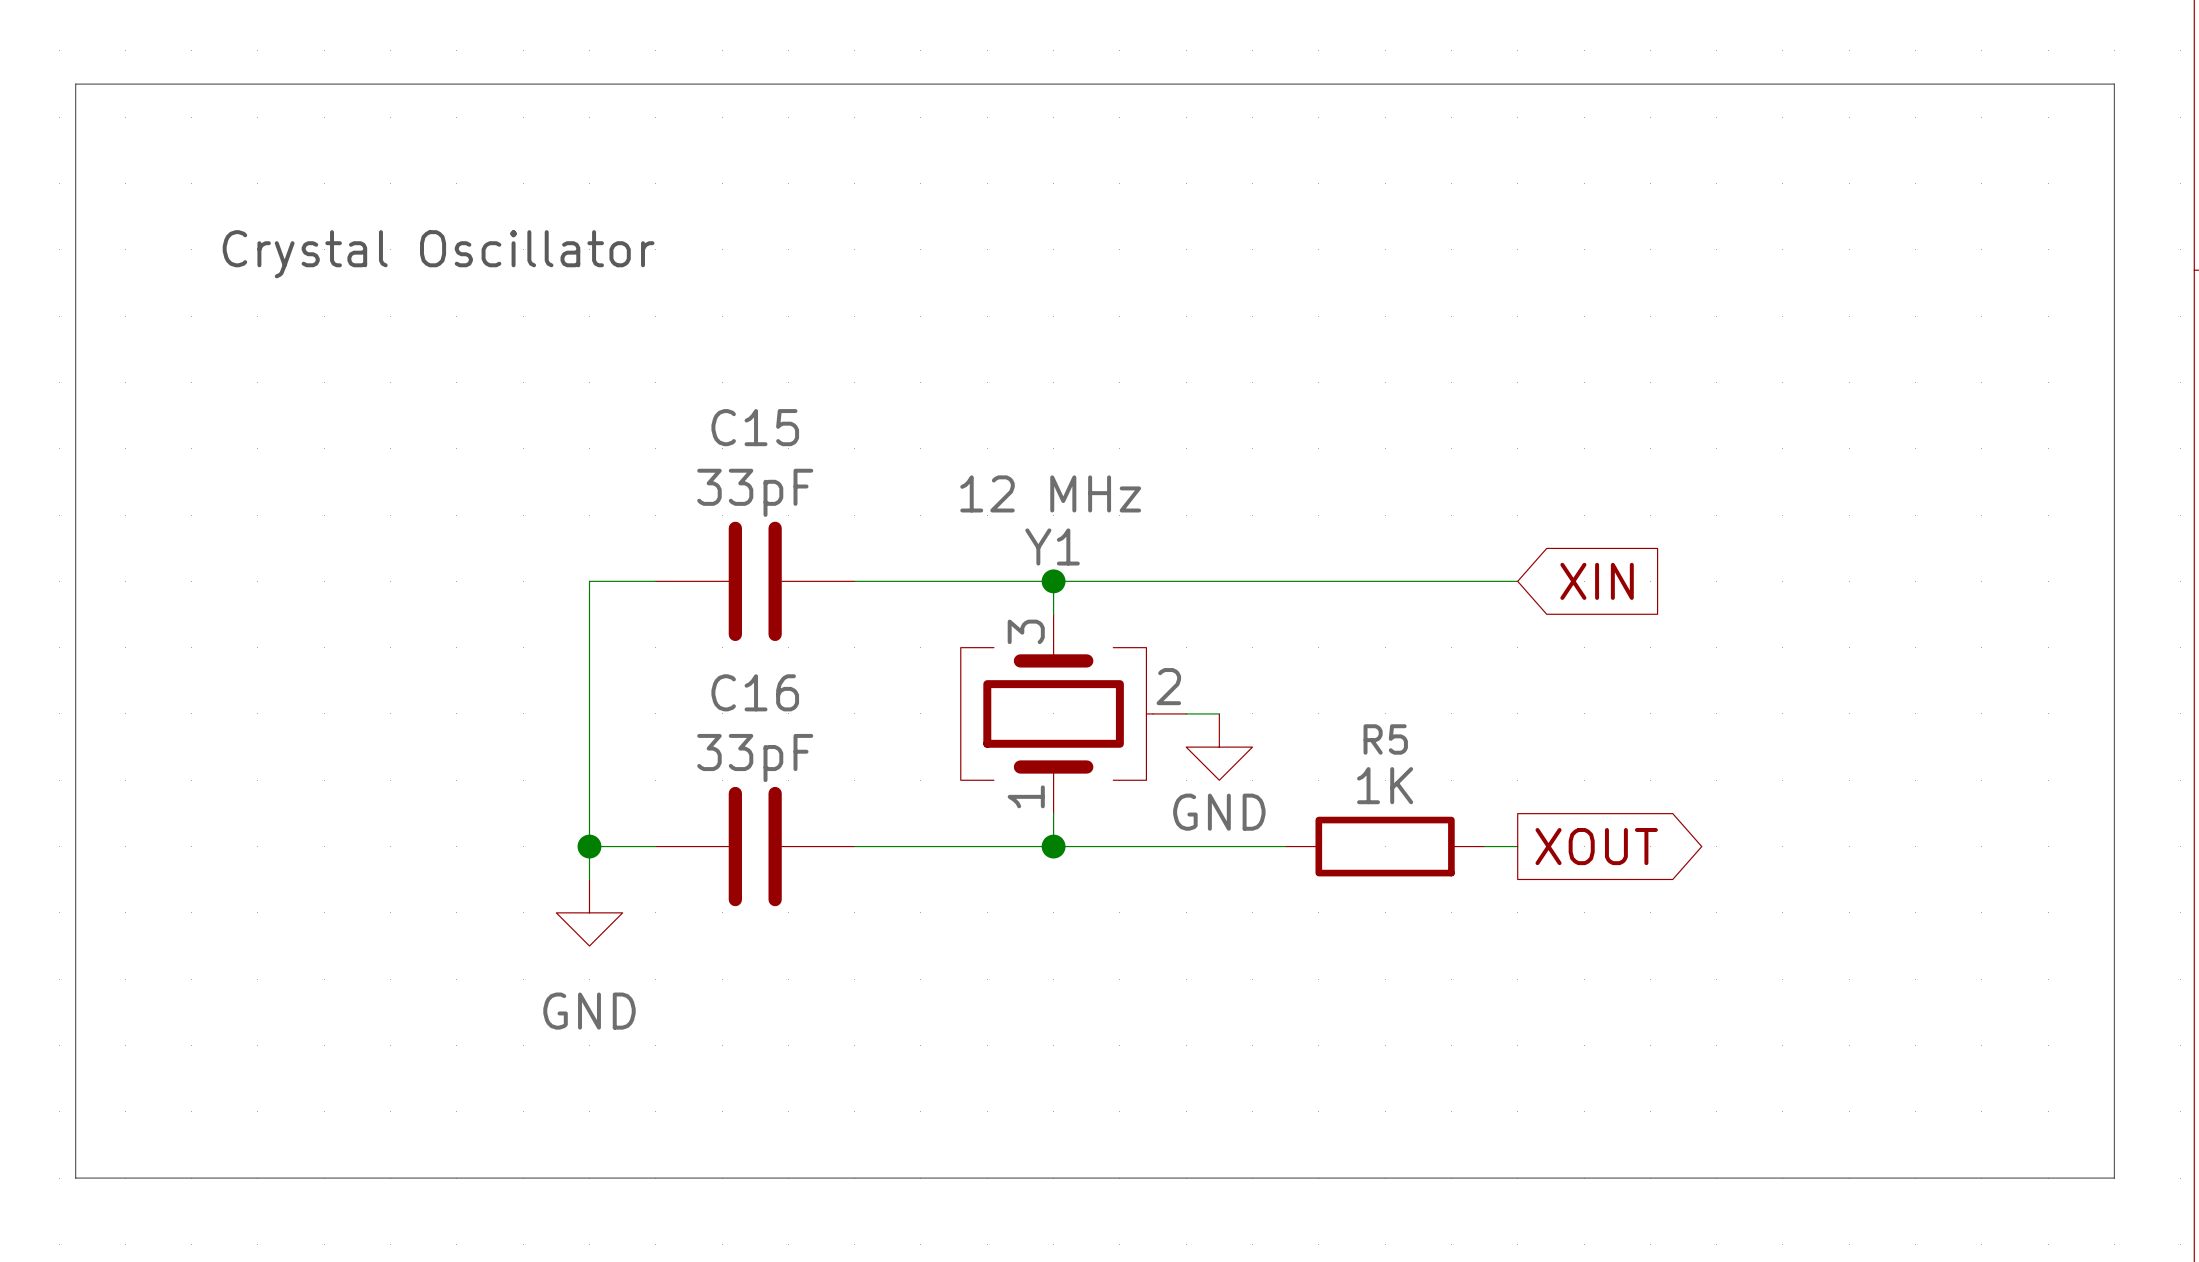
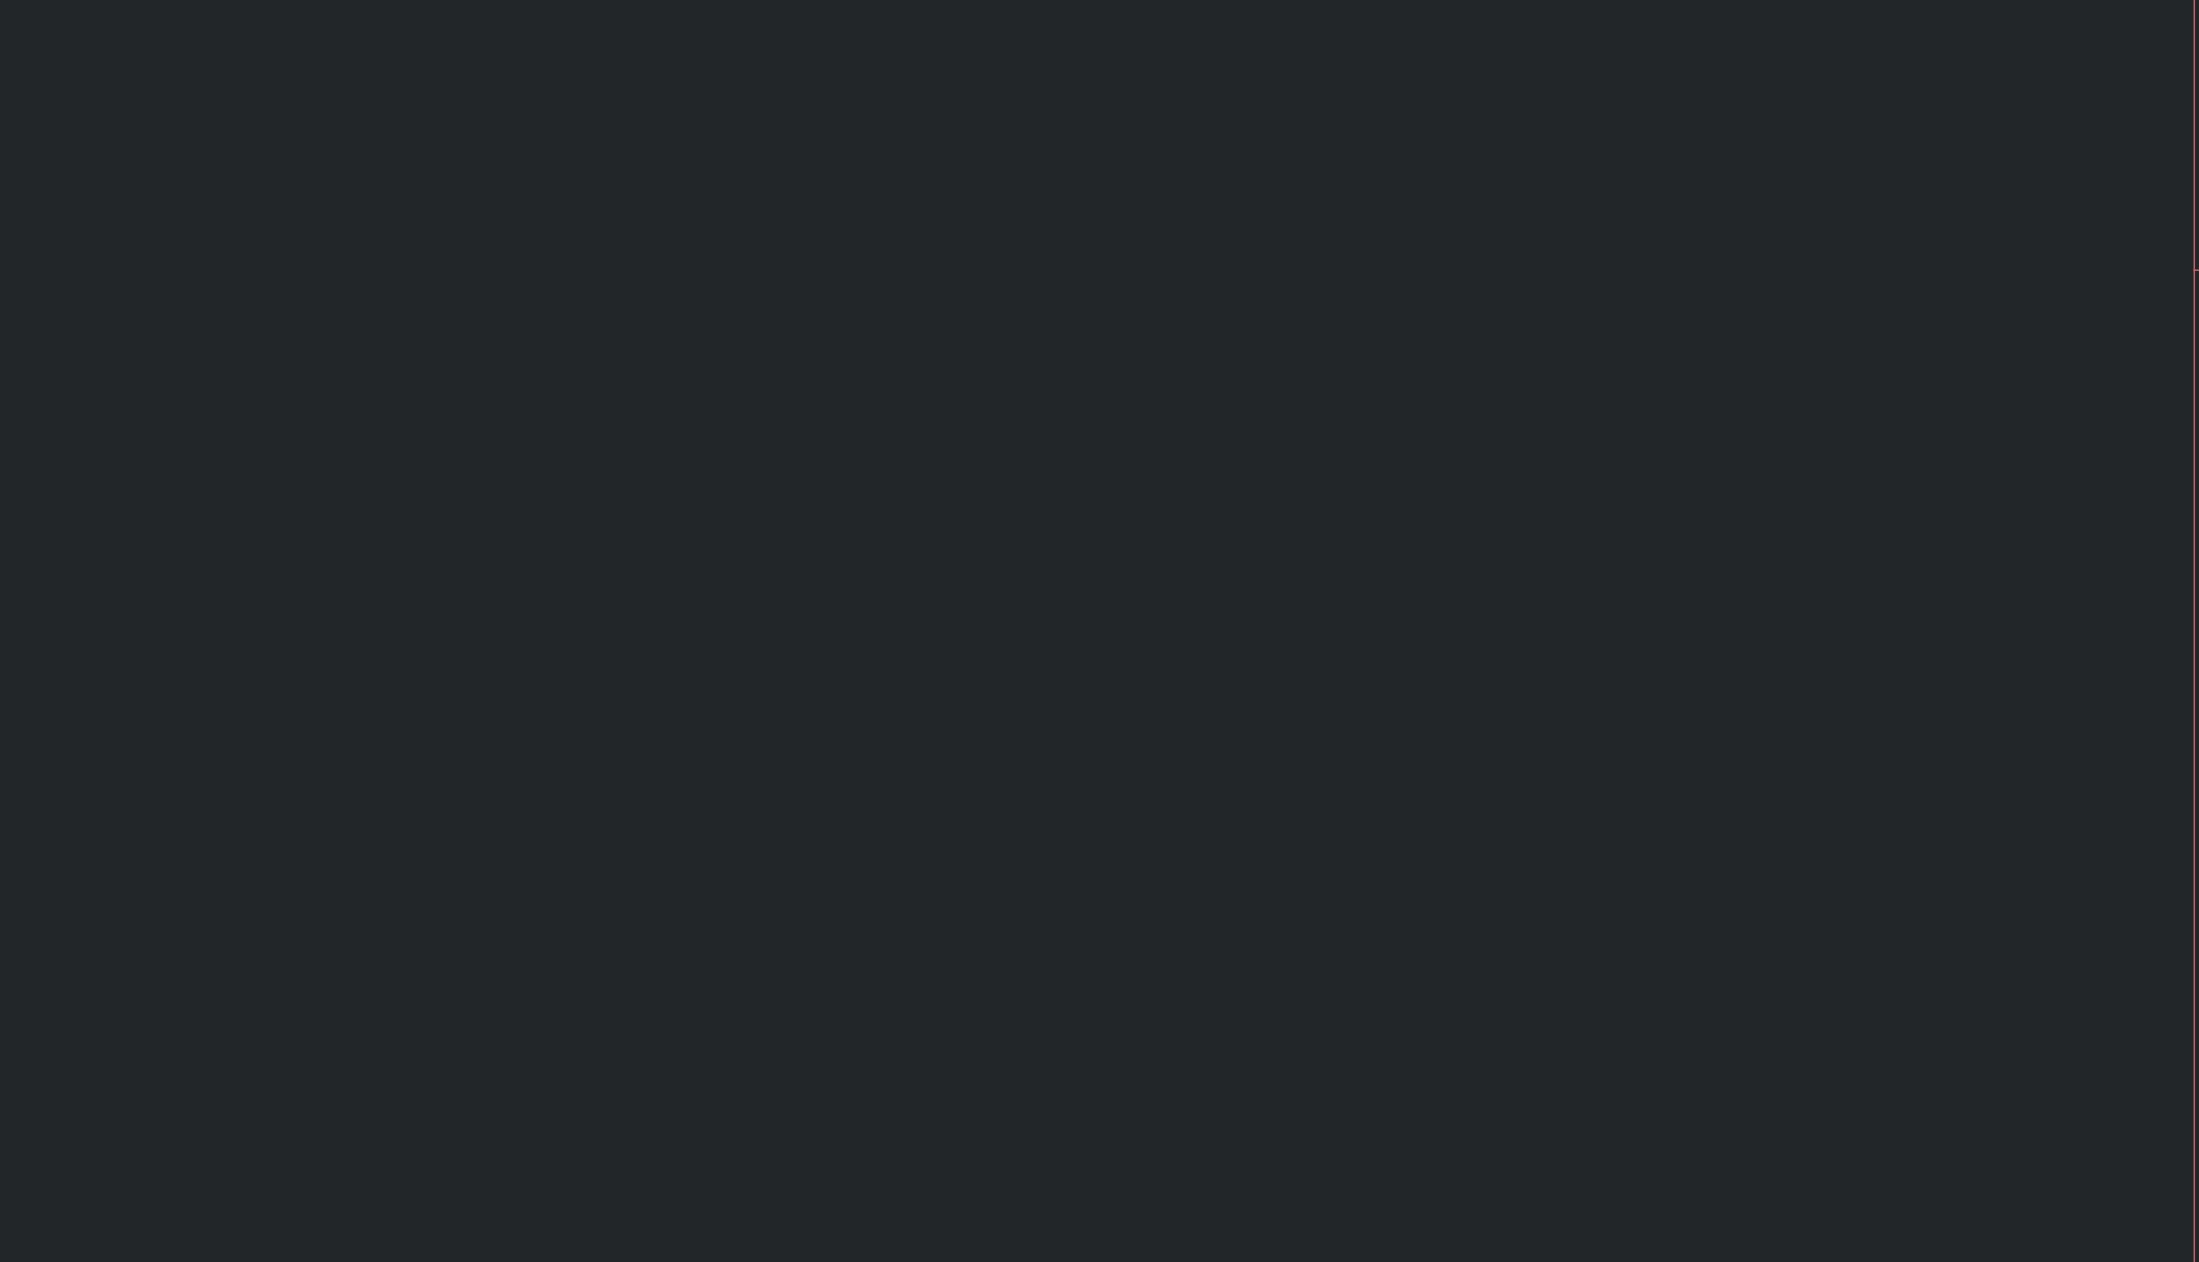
line: (75, 84) (2114, 84) (2114, 1178) (75, 1178) (75, 84) -> none
text: Crystal Oscillator (438, 254) -> none
wire: (655, 581) (589, 581) (589, 879) -> none
C15: 33pF (755, 581) -> none
wire: (854, 581) (1517, 581) -> none
wire: (1053, 581) (1053, 614) -> none
junction: (1053, 581) -> none
global label: XIN (1597, 581) -> none
Y1: 12 MHz (1073, 713) -> none
wire: (1186, 713) (1219, 713) -> none
power symbol: GND (1219, 747) -> none
wire: (1053, 813) (1053, 846) -> none
wire: (589, 846) (655, 846) -> none
junction: (589, 846) -> none
C16: 33pF (755, 846) -> none
wire: (854, 846) (1285, 846) -> none
junction: (1053, 846) -> none
R5: 1K (1385, 846) -> none
wire: (1484, 846) (1517, 846) -> none
global label: XOUT (1596, 846) -> none
power symbol: GND (589, 912) -> none

